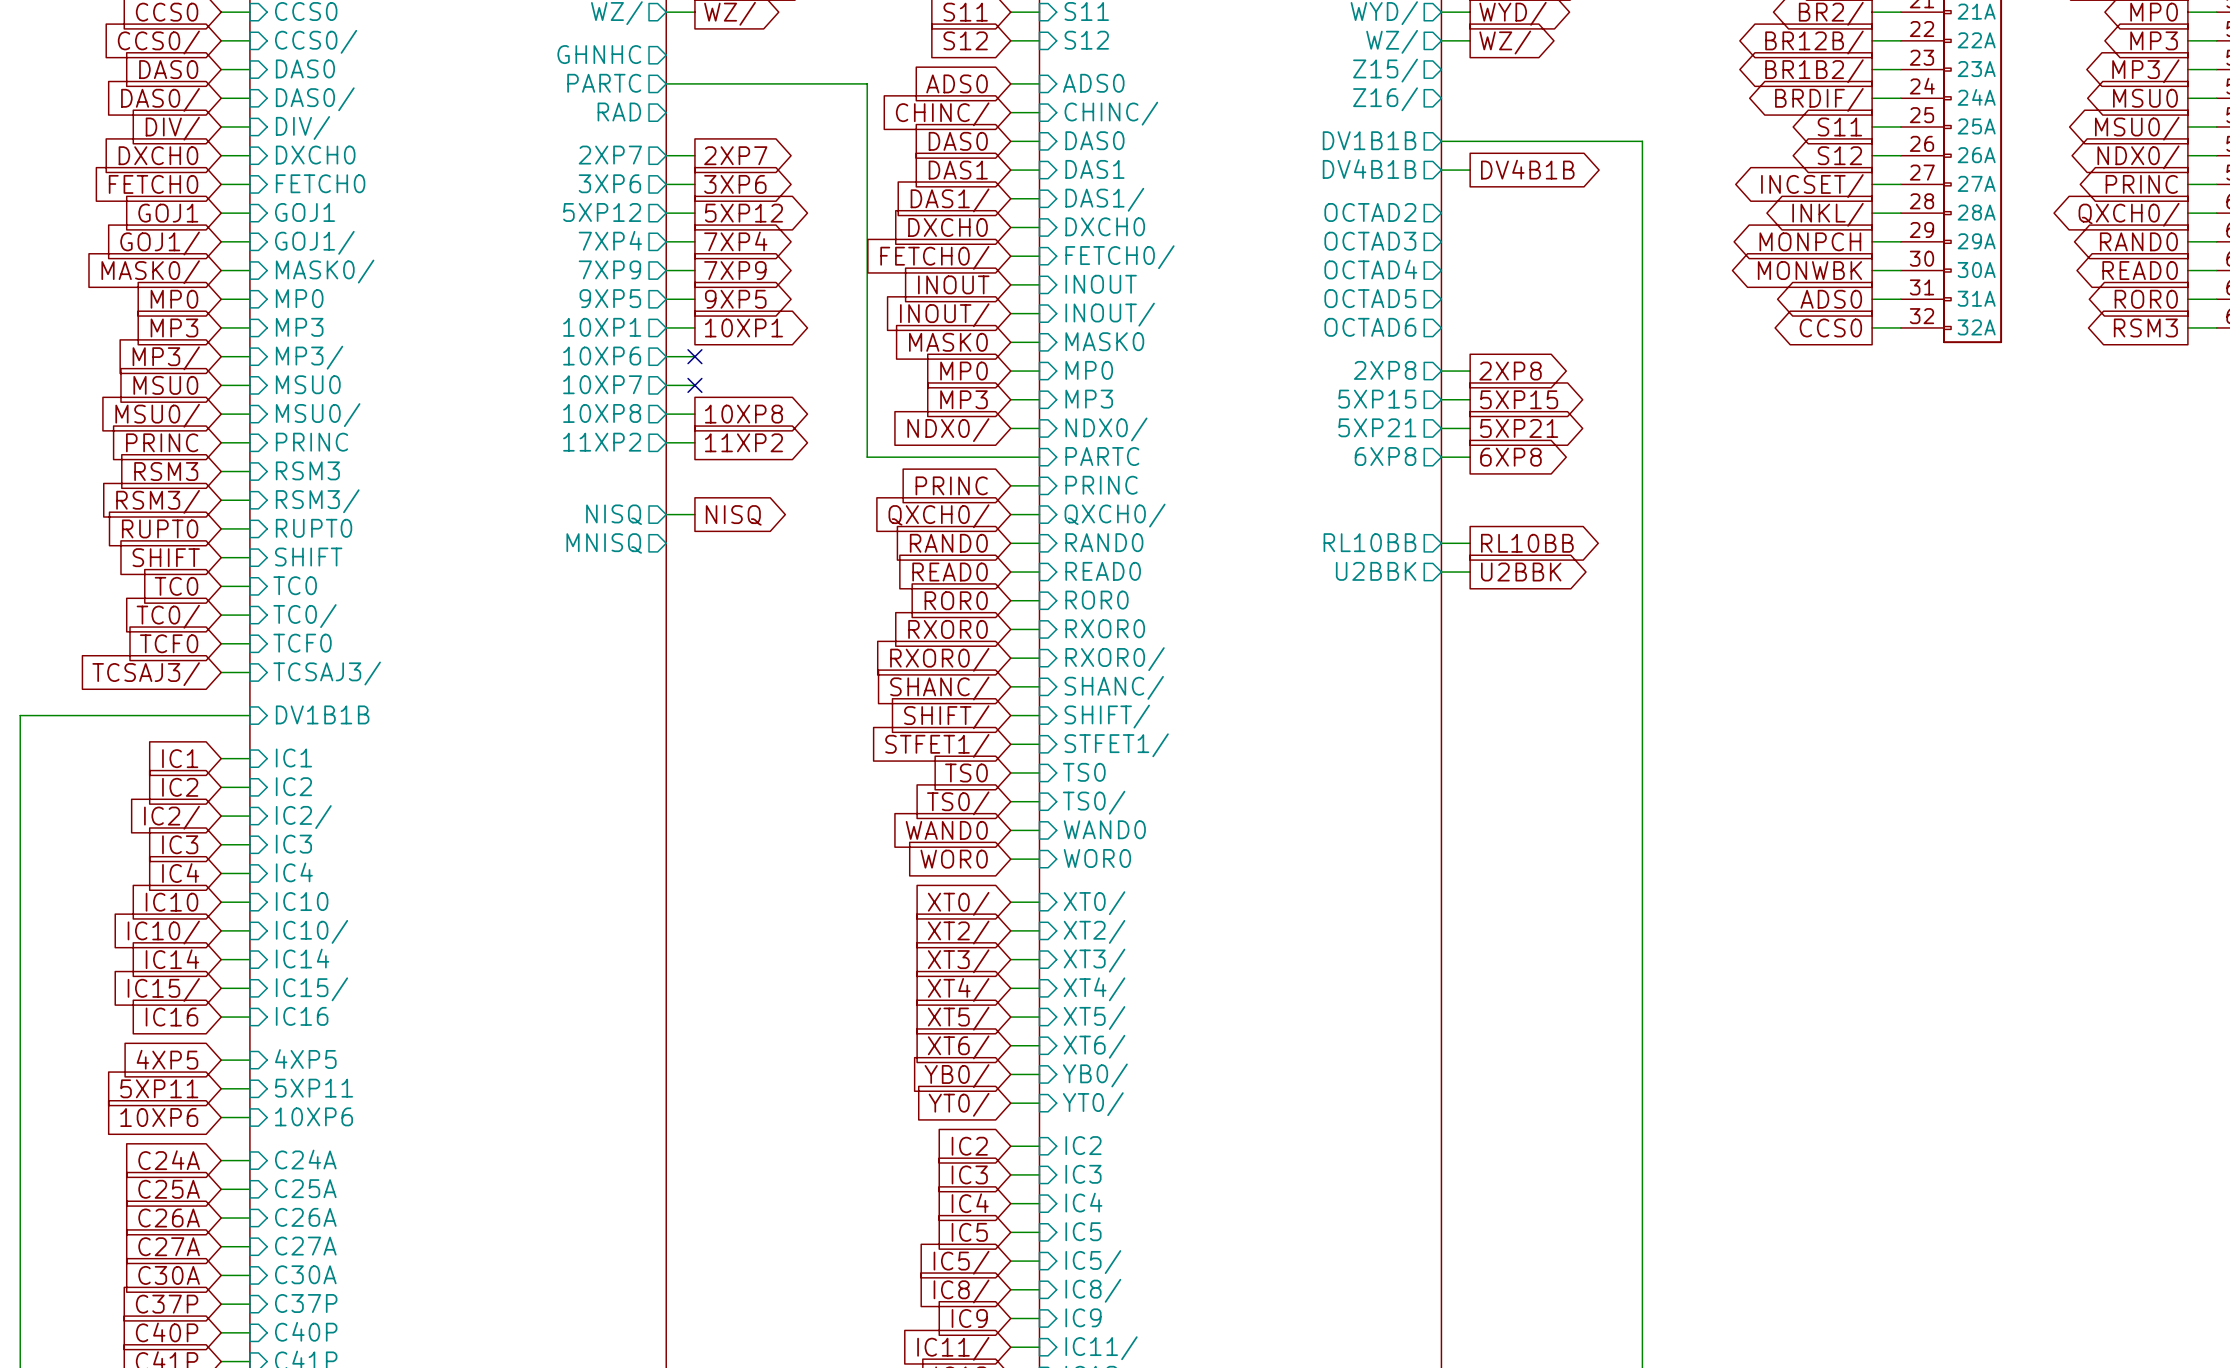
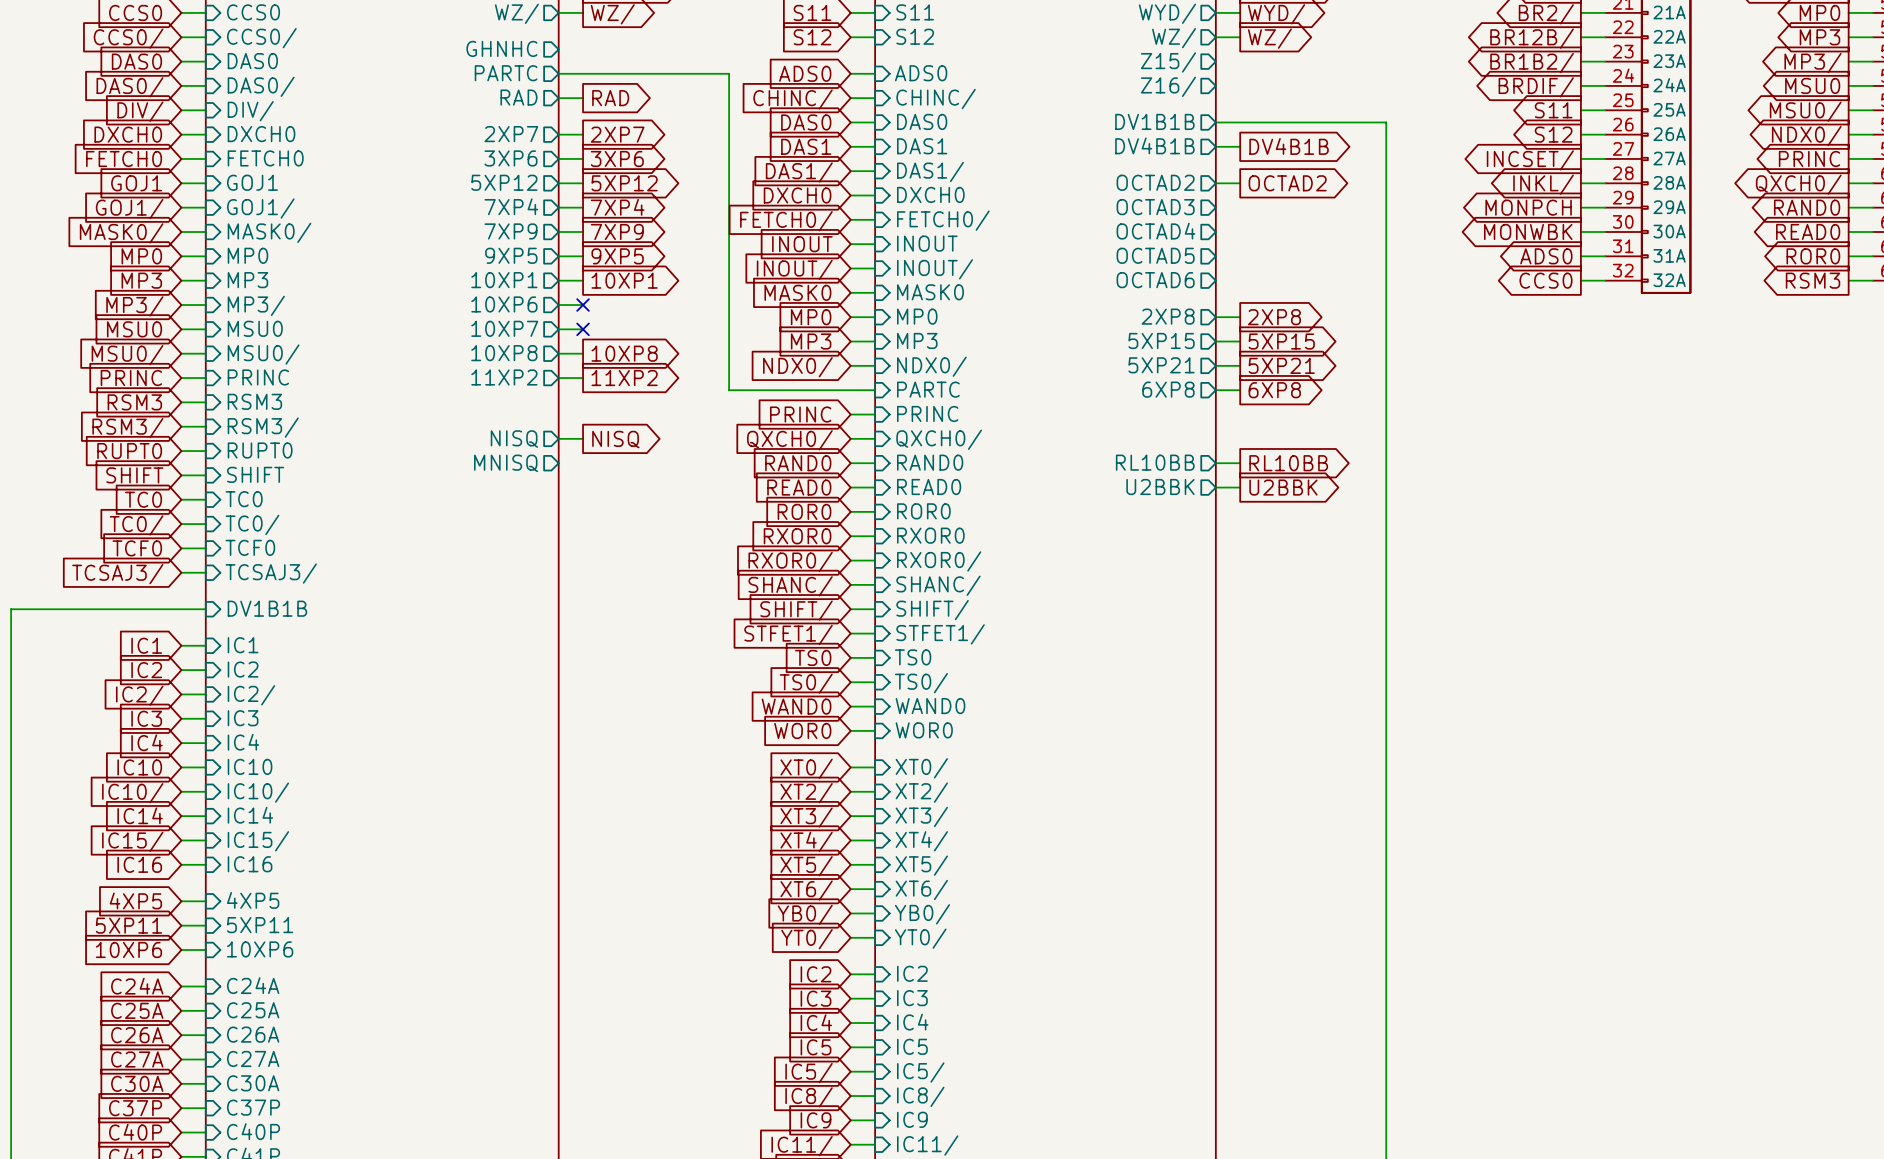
wire: none -> (558, 98) (583, 98)
global label: none -> RAD (610, 98)
wire: none -> (1215, 183) (1240, 183)
global label: none -> OCTAD2 (1287, 183)

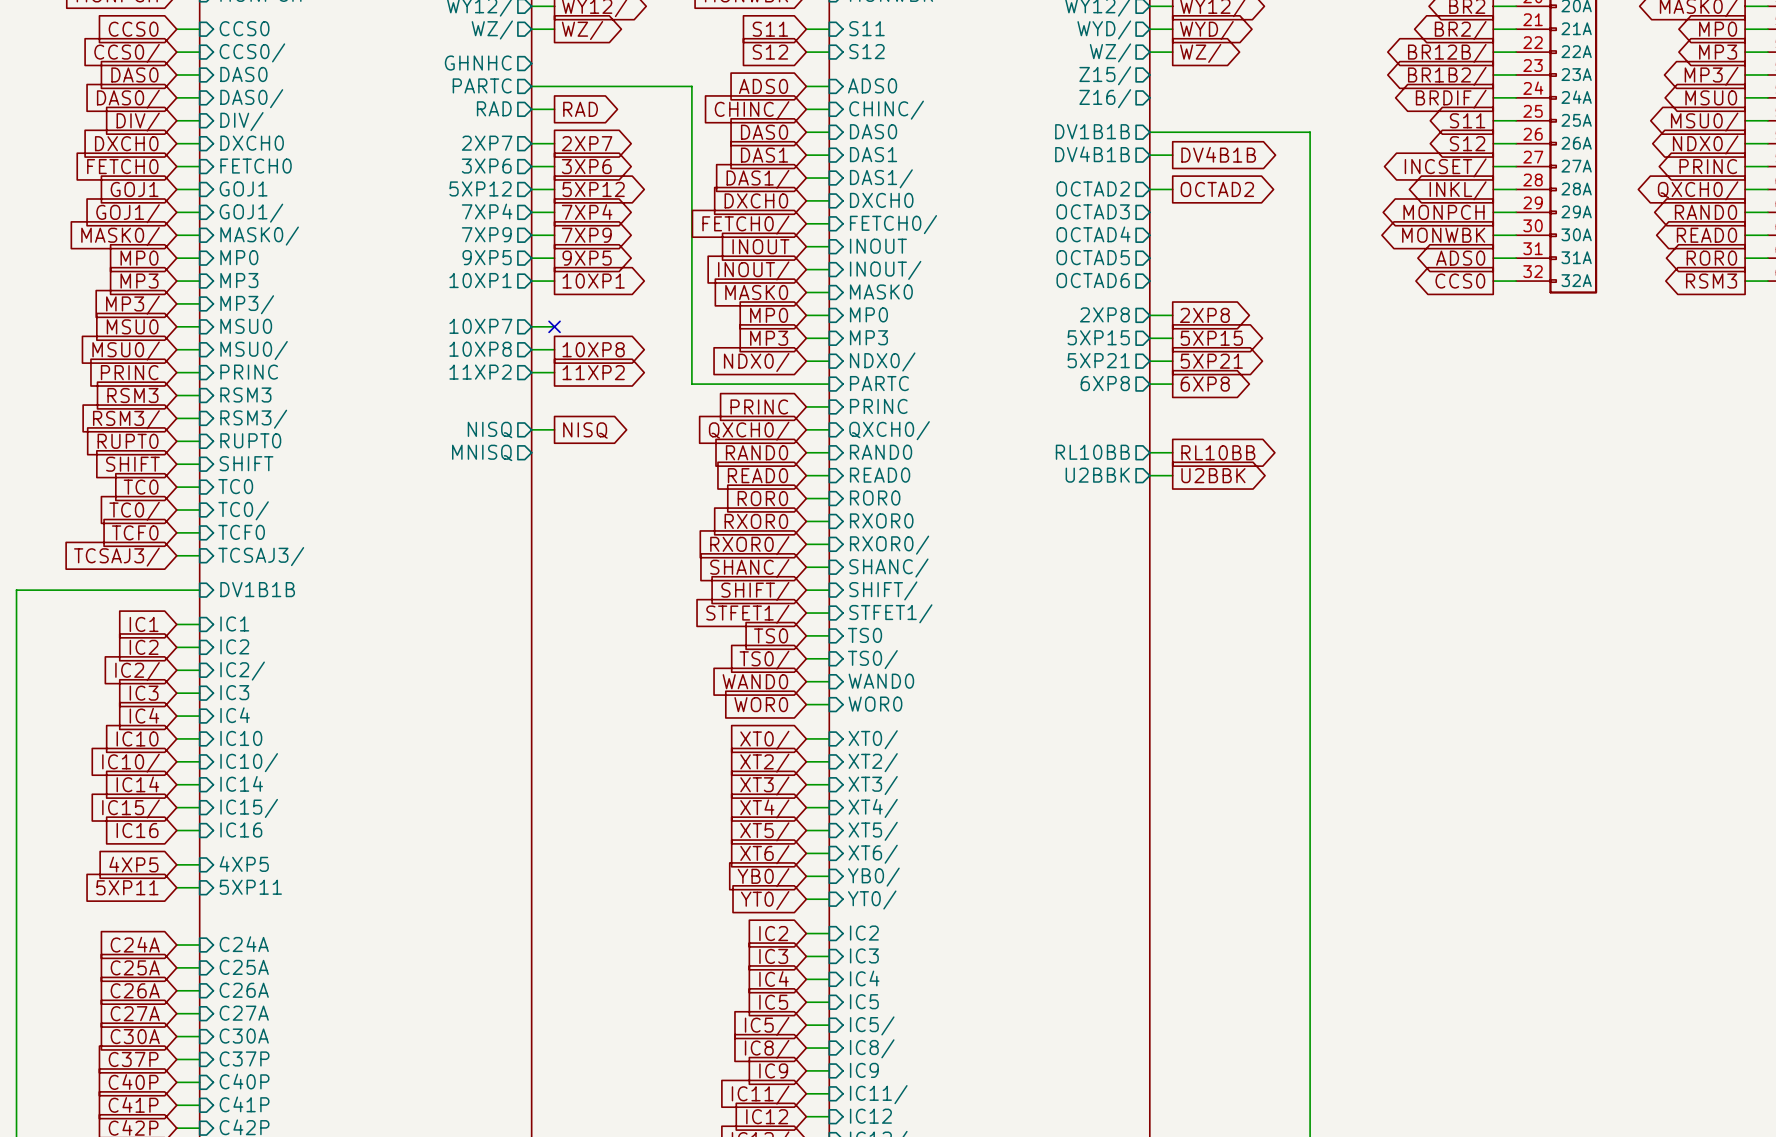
sheet pin: 10XP6 (504, 304) -> none
wire: (558, 305) (583, 305) -> none
no-connect mark: (583, 305) -> none
global label: 10XP6 (128, 949) -> none
wire: (181, 949) (205, 949) -> none
sheet pin: 10XP6 (260, 949) -> none

